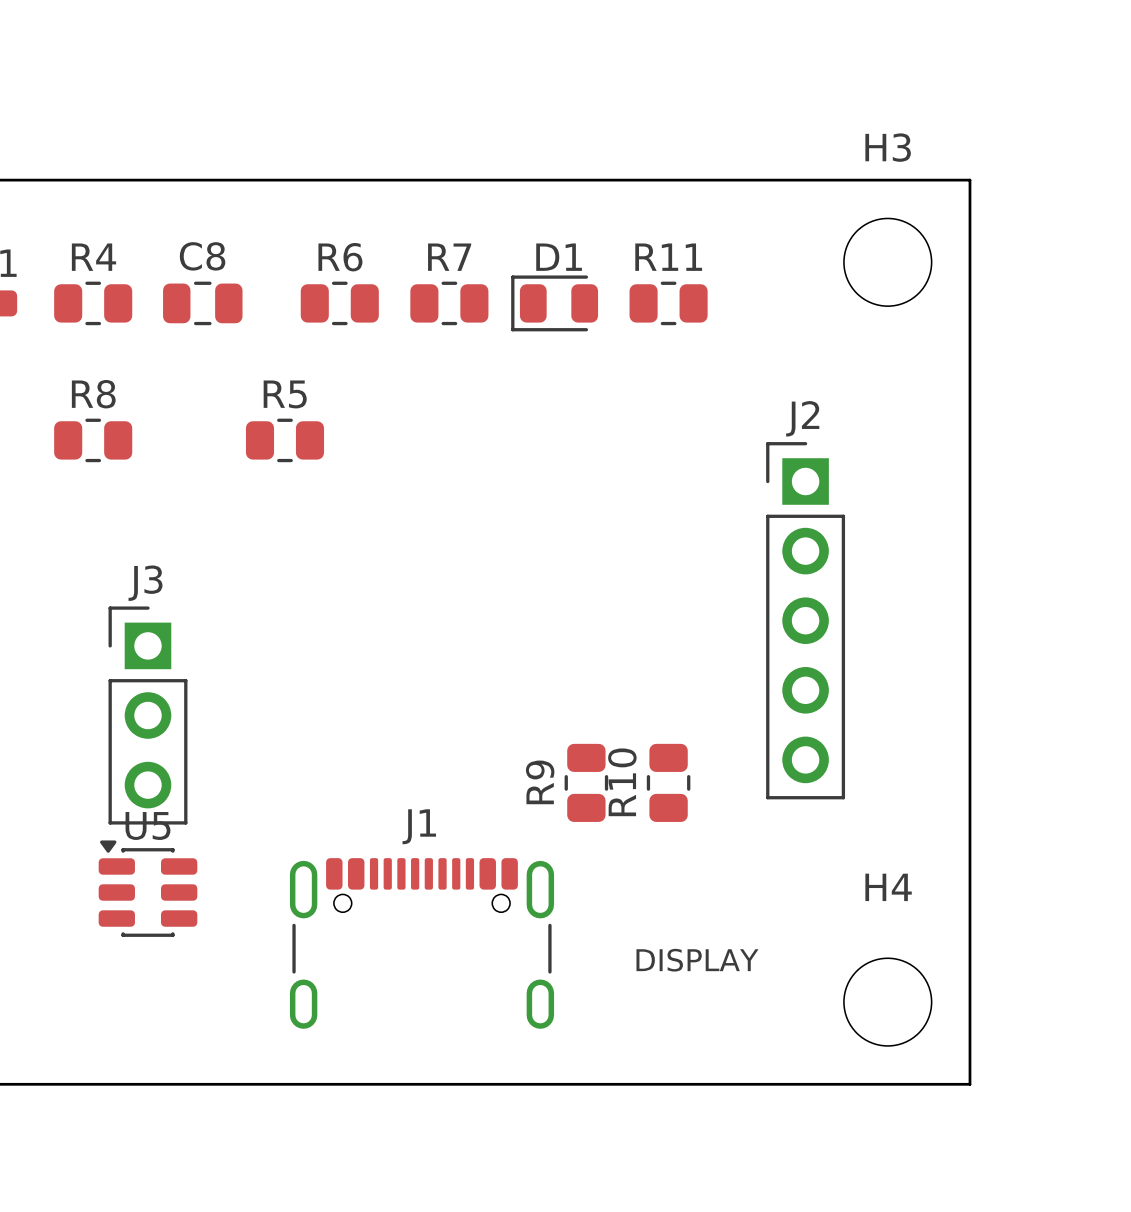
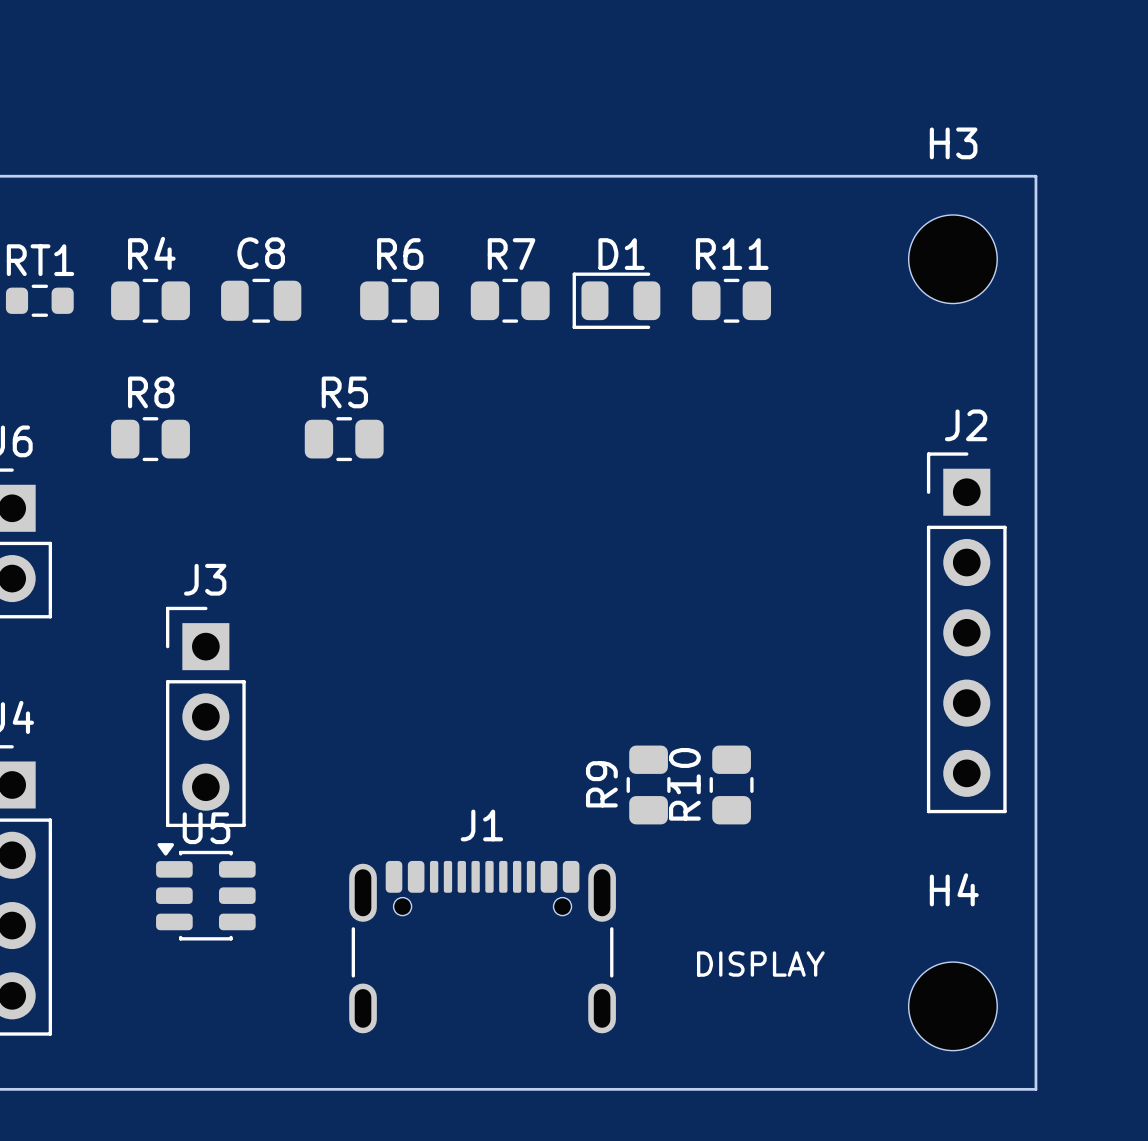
J2 position: (805, 620) -> (966, 632)

